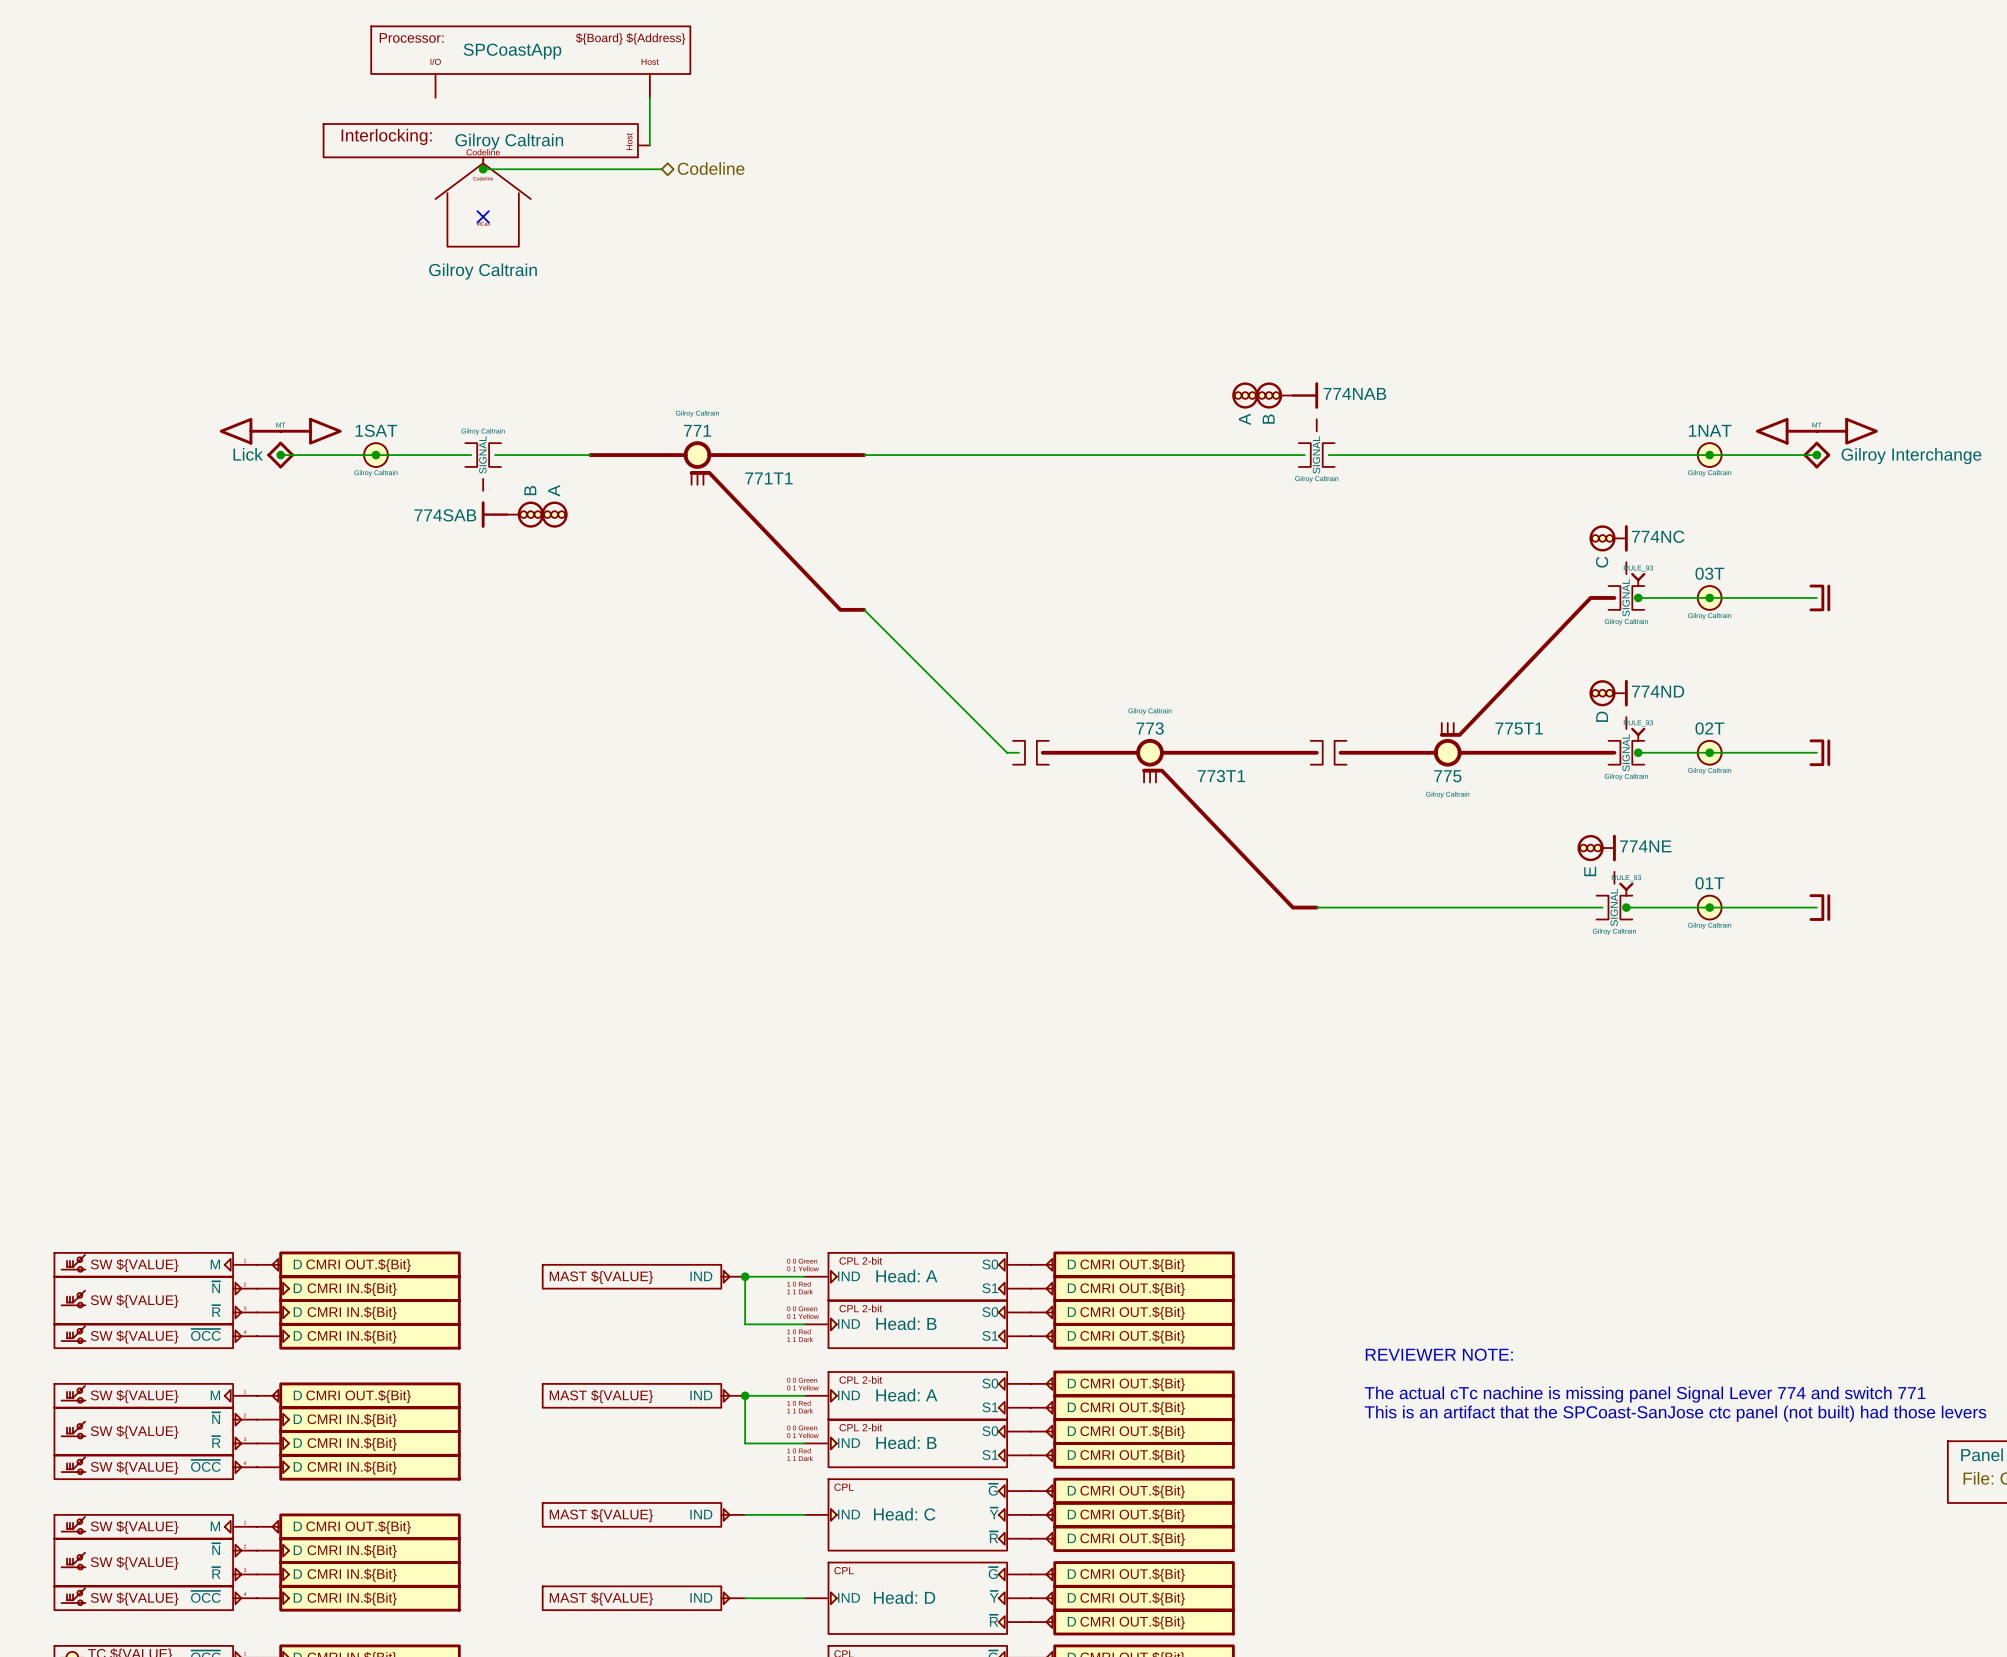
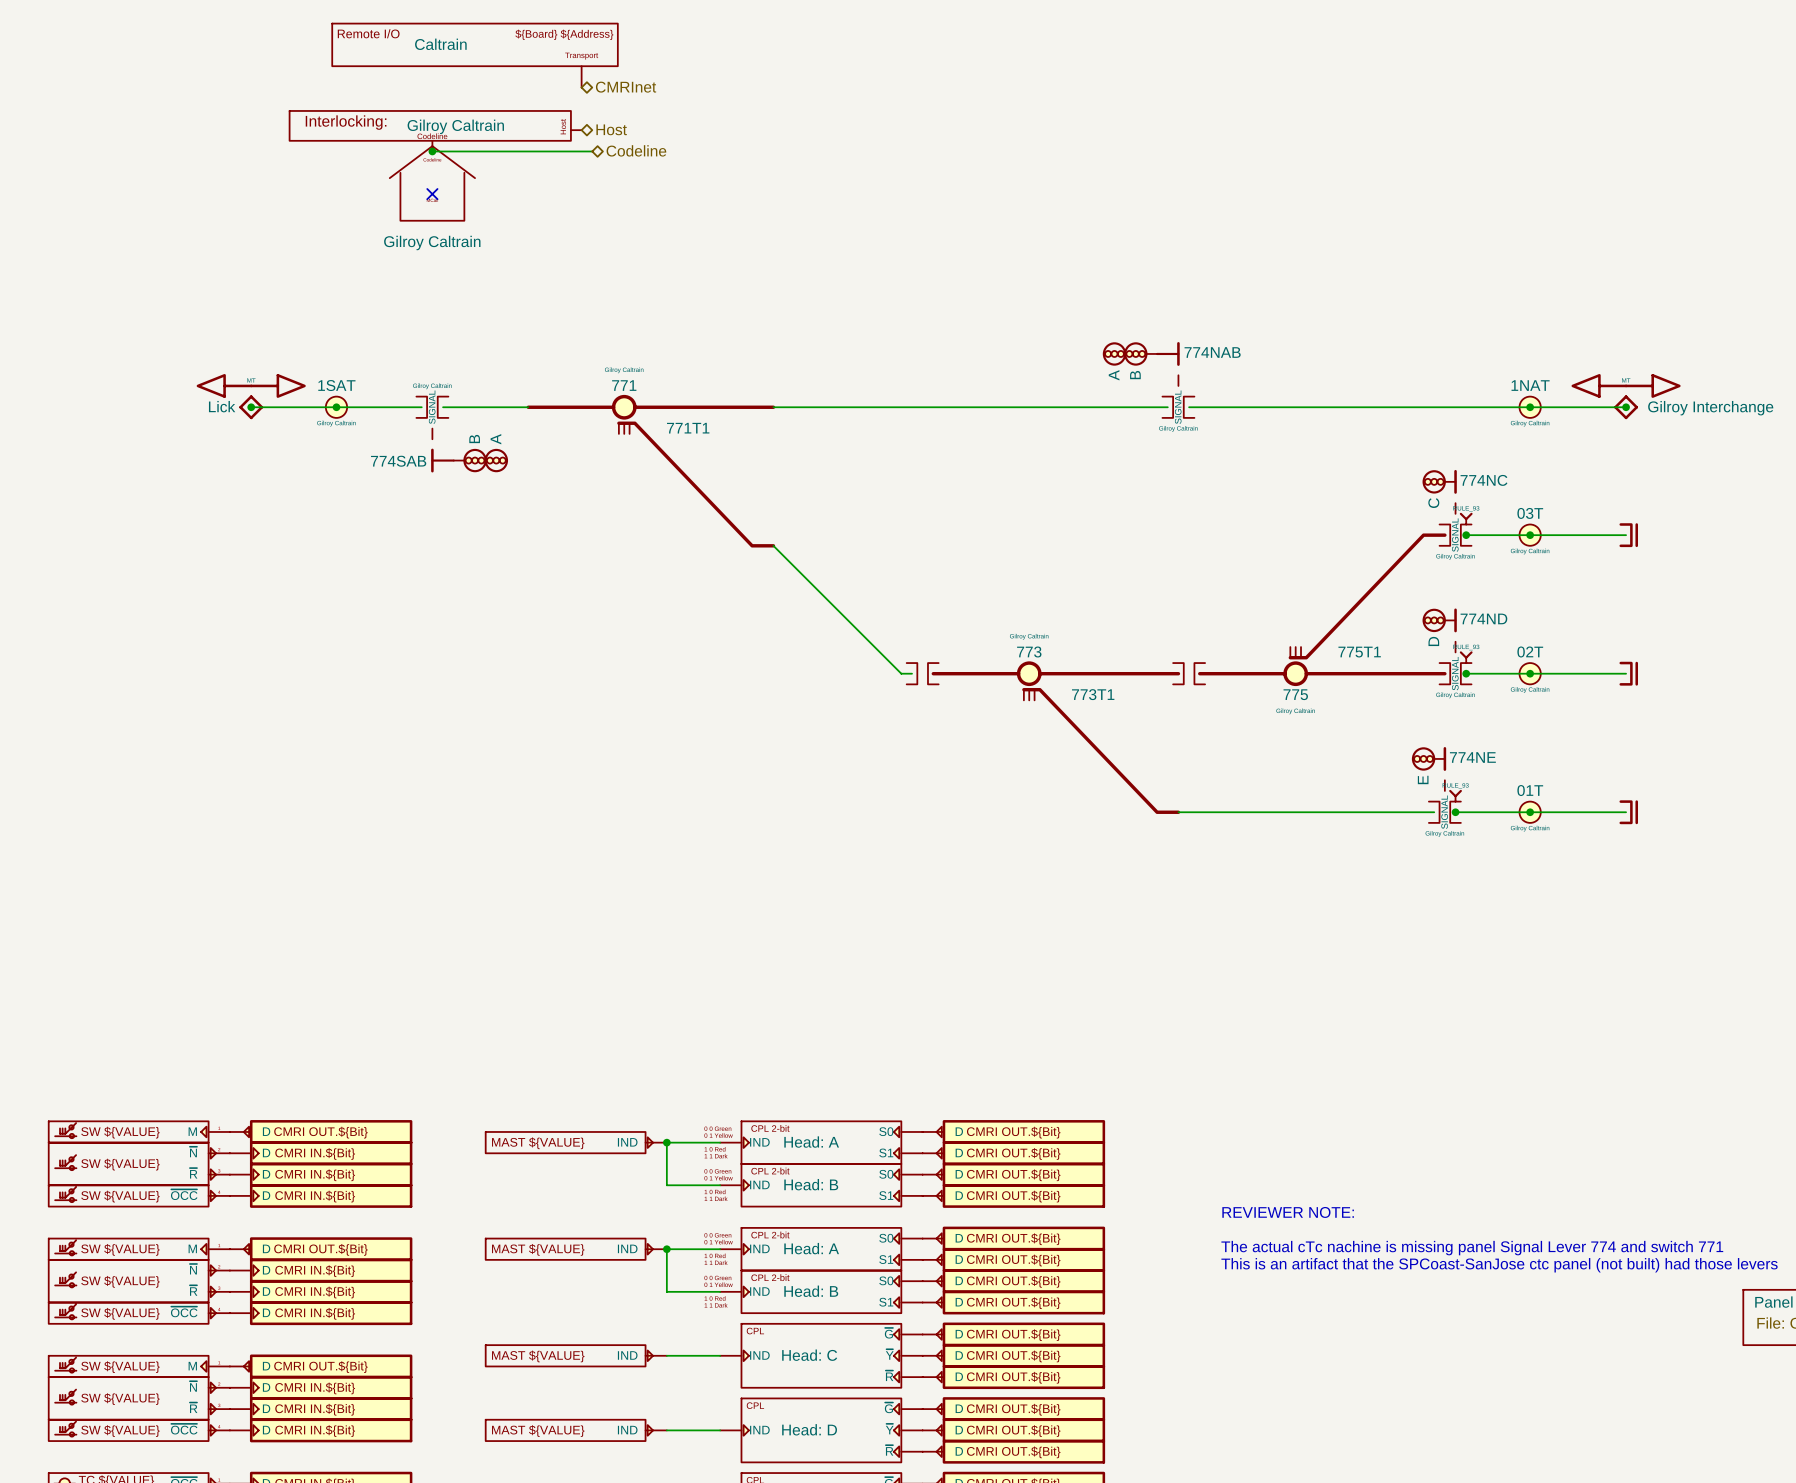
part symbol: [371, 26, 691, 98] -> [332, 23, 618, 88]
part value: SPCoastApp (512, 51) -> Caltrain (440, 44)
wire: (649, 97) (649, 145) -> none
hierarchical label: none -> CMRInet (626, 87)
hierarchical label: none -> Host (611, 129)

